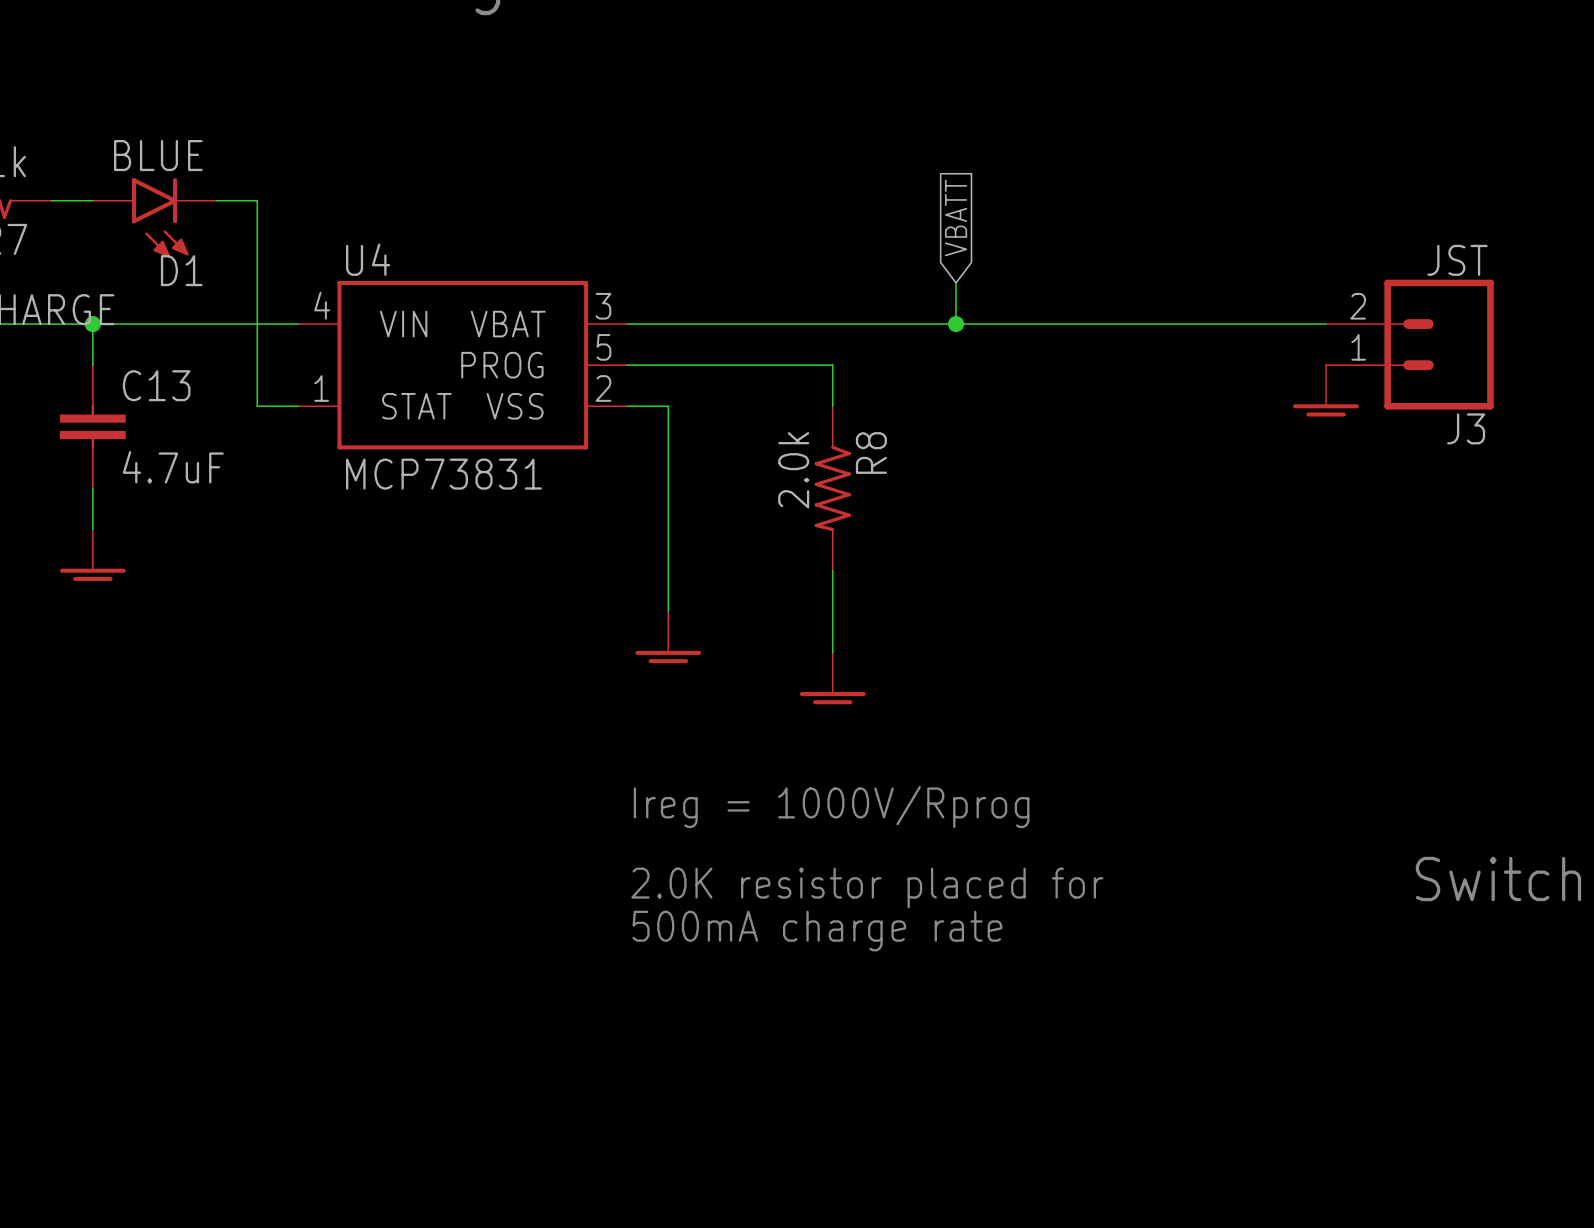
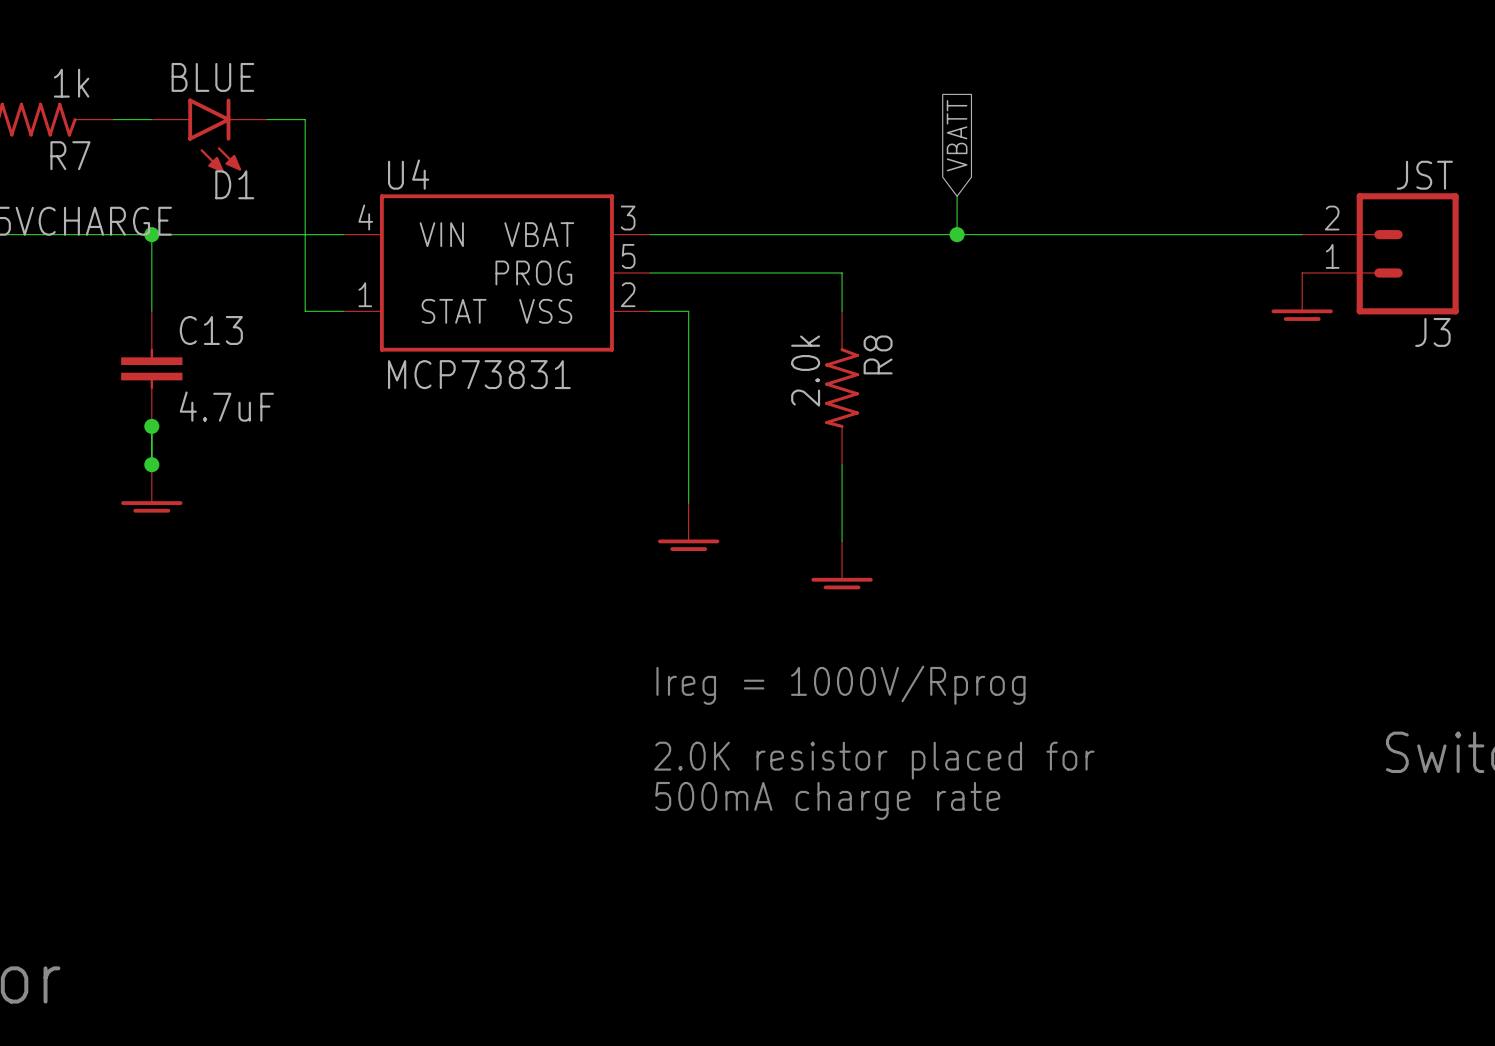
C13 position: (92, 426) -> (151, 368)
junction: none -> (151, 426)
power symbol position: (92, 555) -> (151, 488)
junction: none -> (151, 464)

